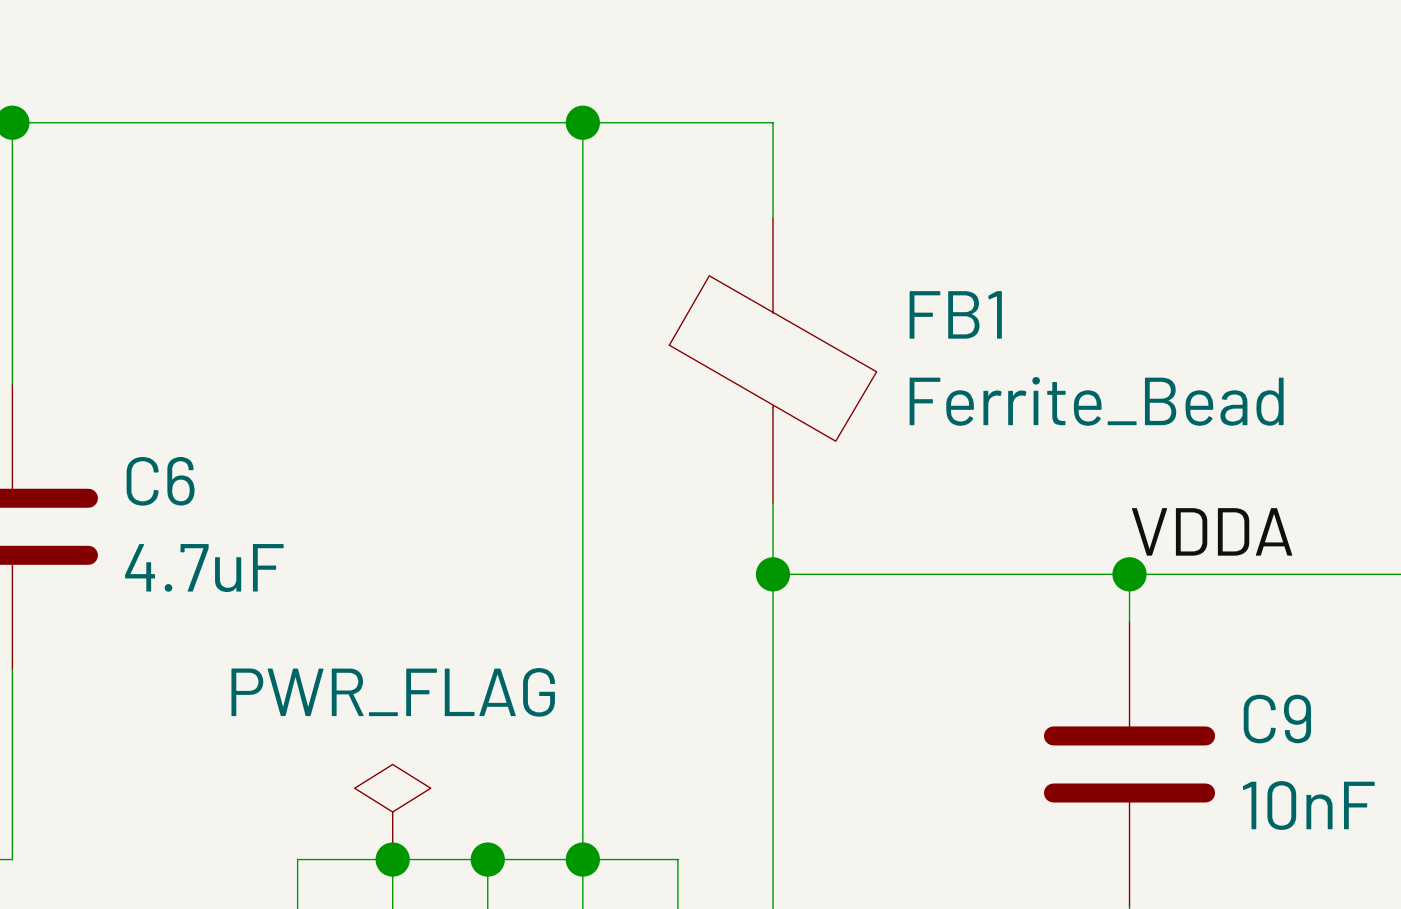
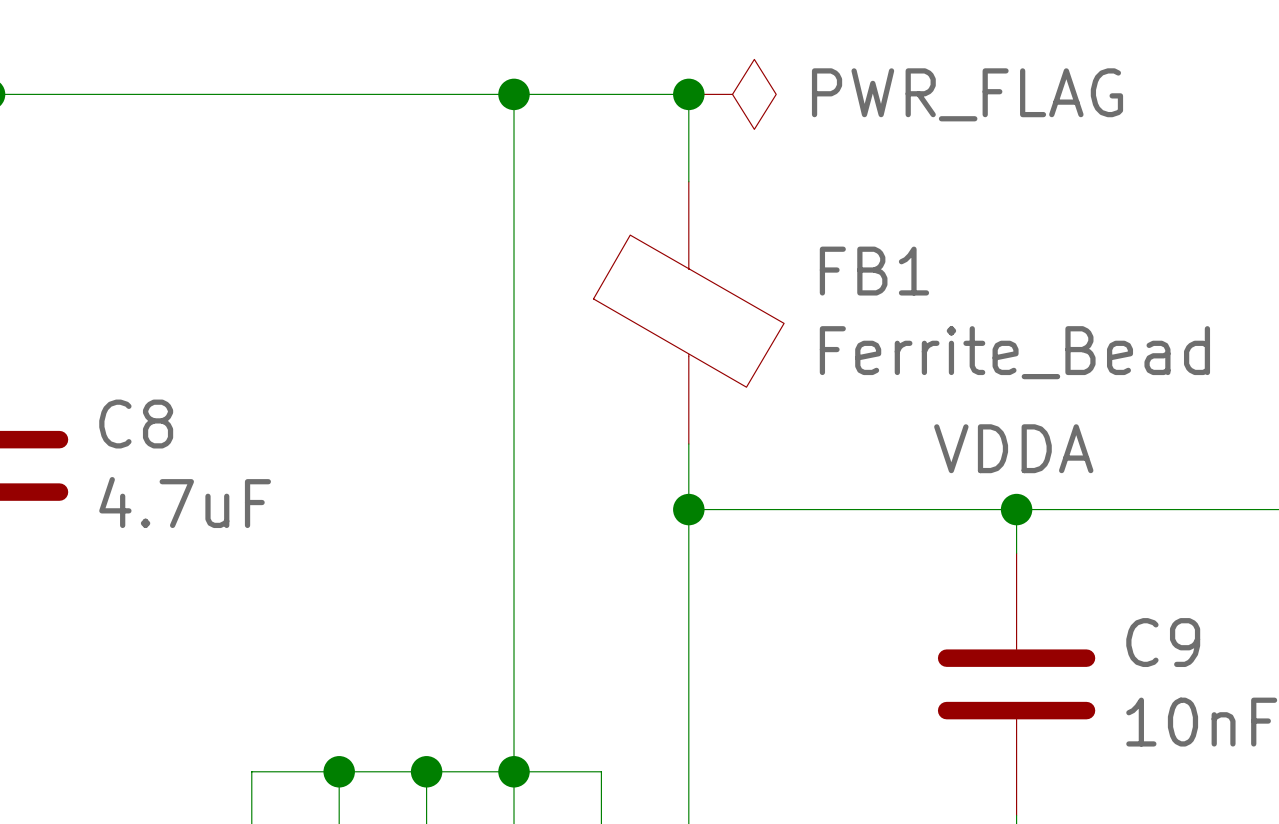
junction: none -> (688, 94)
C6 name: C6 (160, 481) -> C8 (136, 424)
label position: VDDA (1212, 531) -> VDDA (1013, 448)
power symbol text position: PWR_FLAG (393, 692) -> PWR_FLAG (967, 94)
power symbol rotation: 0° (392, 812) -> 90° clockwise (732, 94)
power symbol position: PWR_FLAG (392, 812) -> PWR_FLAG (732, 94)

